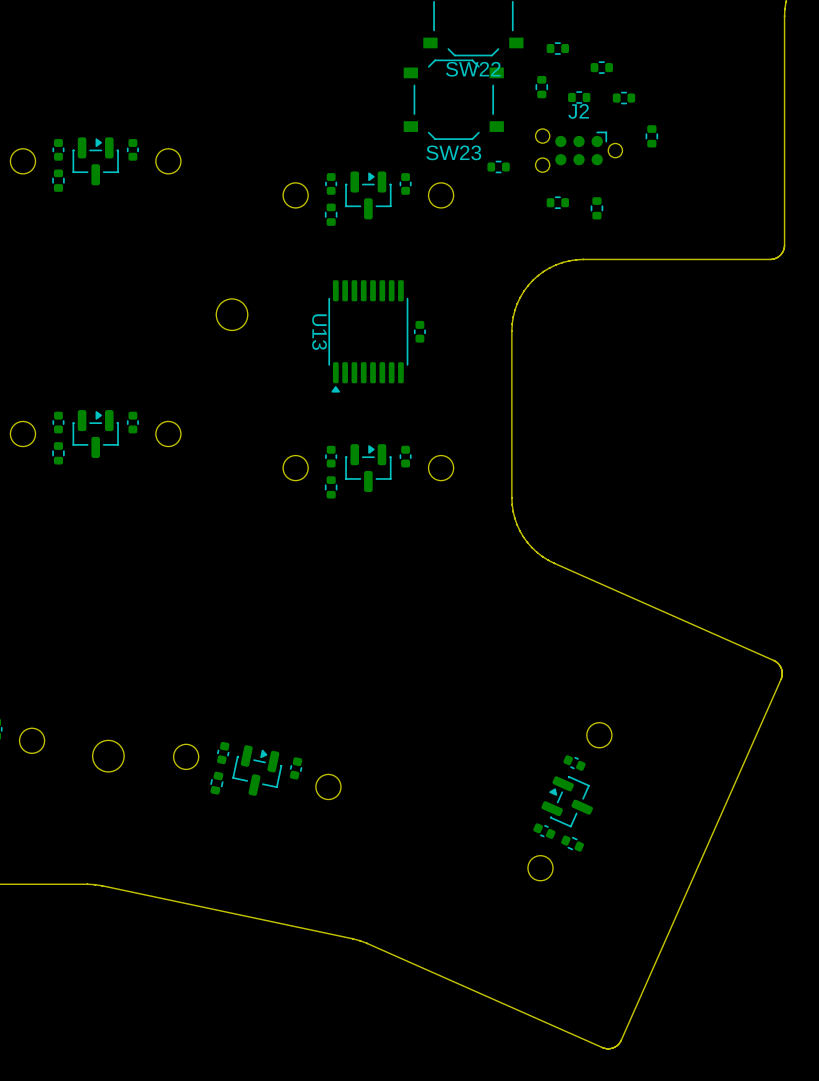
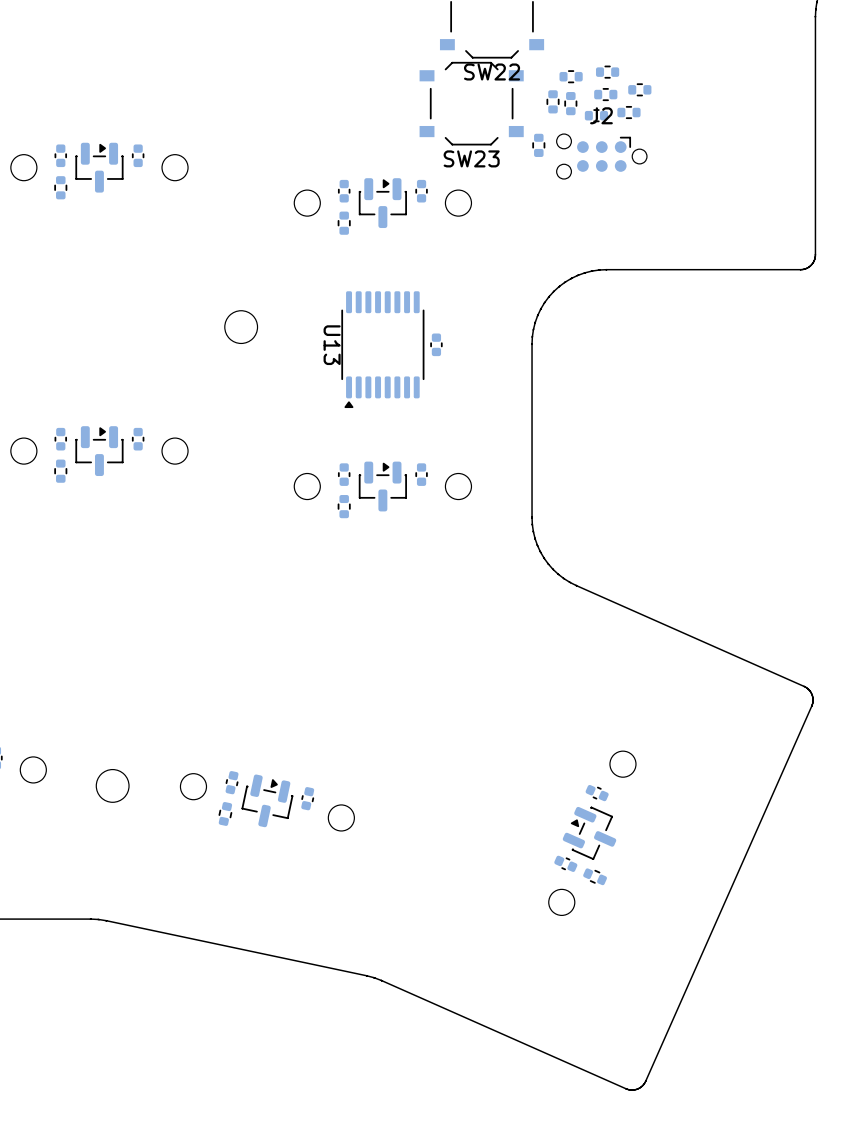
part: (557, 48) -> none
part: (601, 67) -> none
part: none -> (607, 72)
part: none -> (571, 76)
part: none -> (639, 89)
part: (541, 87) -> none
part: none -> (605, 94)
part: none -> (553, 101)
part: (579, 97) -> none
part: (624, 98) -> none
part: none -> (570, 103)
part: none -> (628, 112)
part: none -> (596, 115)
part: (651, 136) -> none
part: none -> (538, 145)
part: (498, 167) -> none
part: (557, 202) -> none
part: (596, 208) -> none

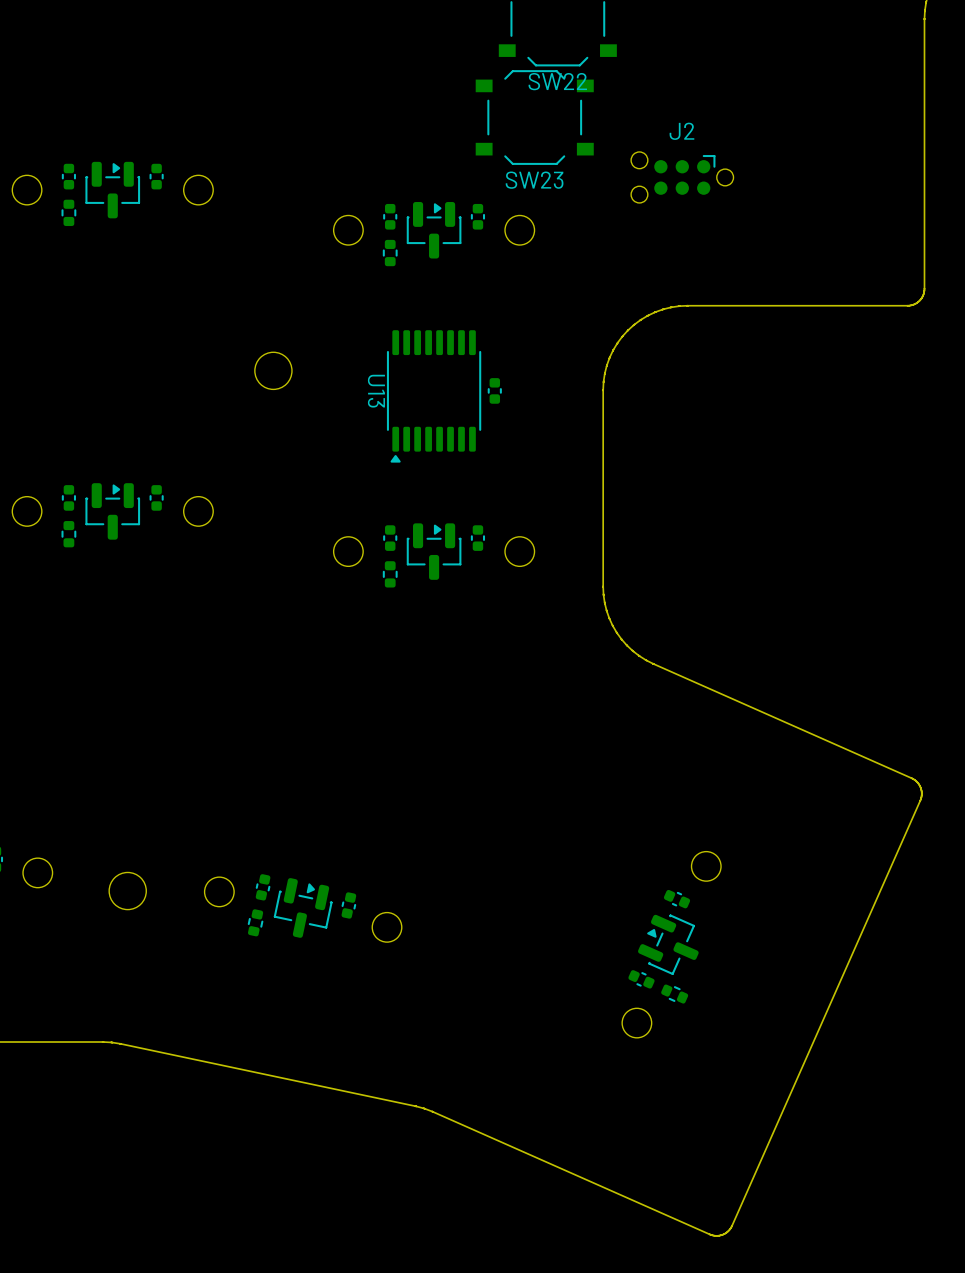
part: (607, 72) -> none
part: (571, 76) -> none
part: (639, 89) -> none
part: (605, 94) -> none
part: (553, 101) -> none
part: (570, 103) -> none
part: (628, 112) -> none
part: (596, 115) -> none
part: (538, 145) -> none

